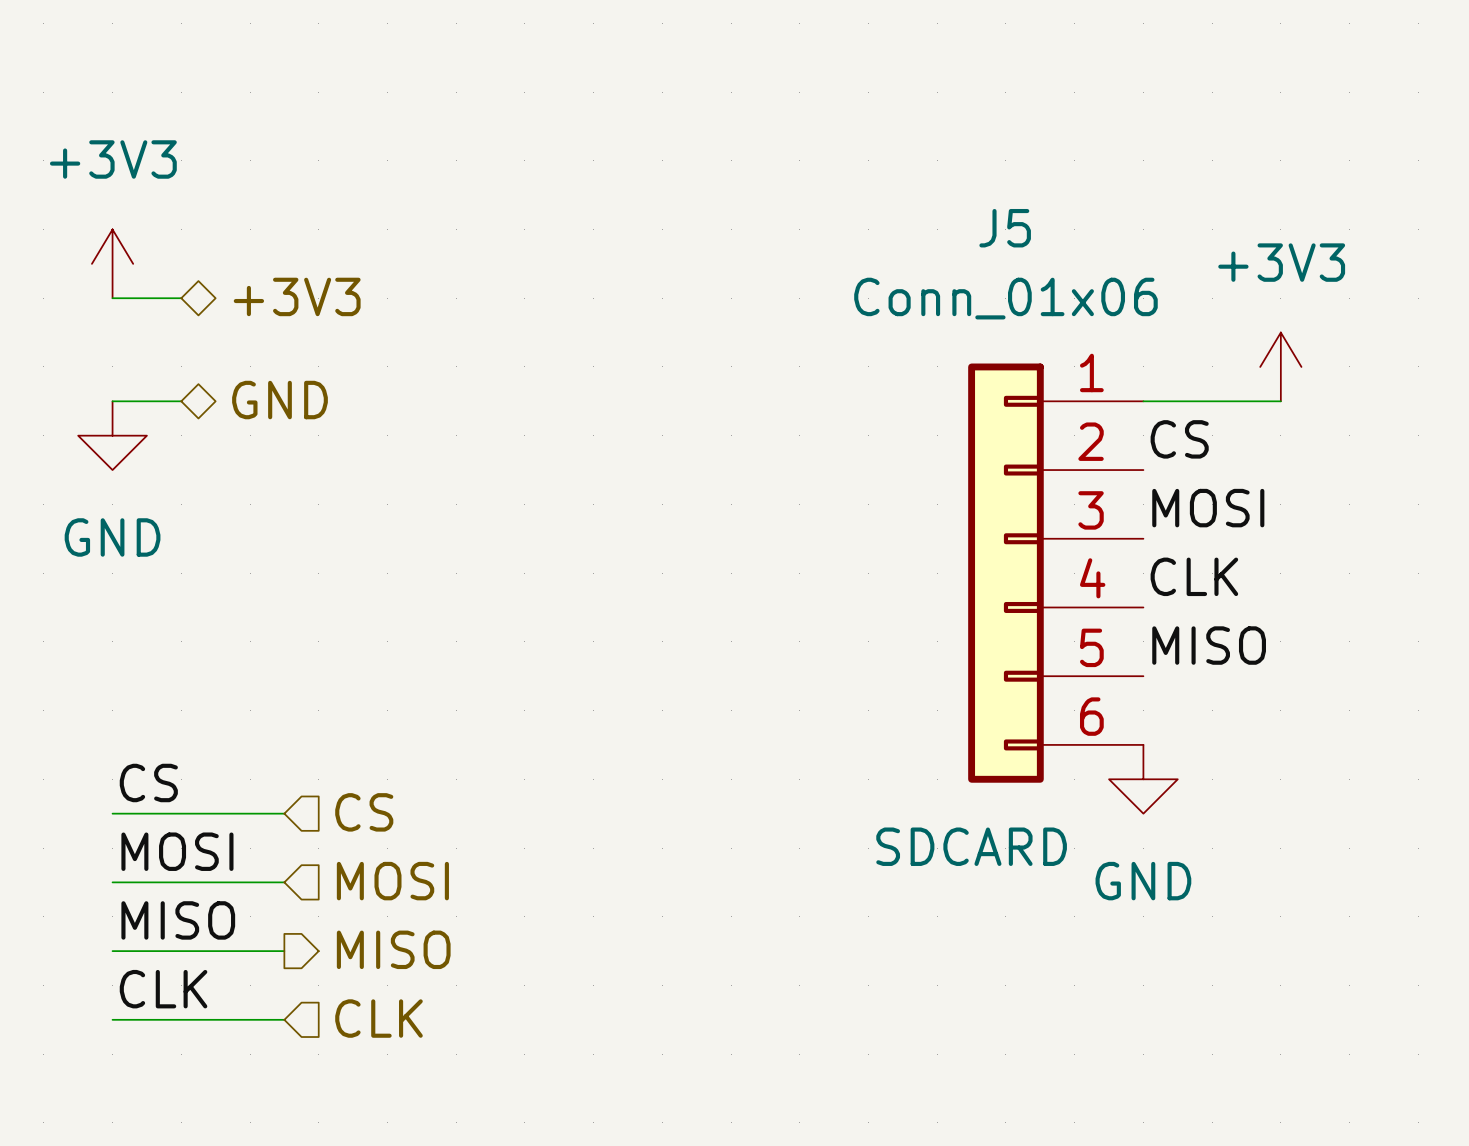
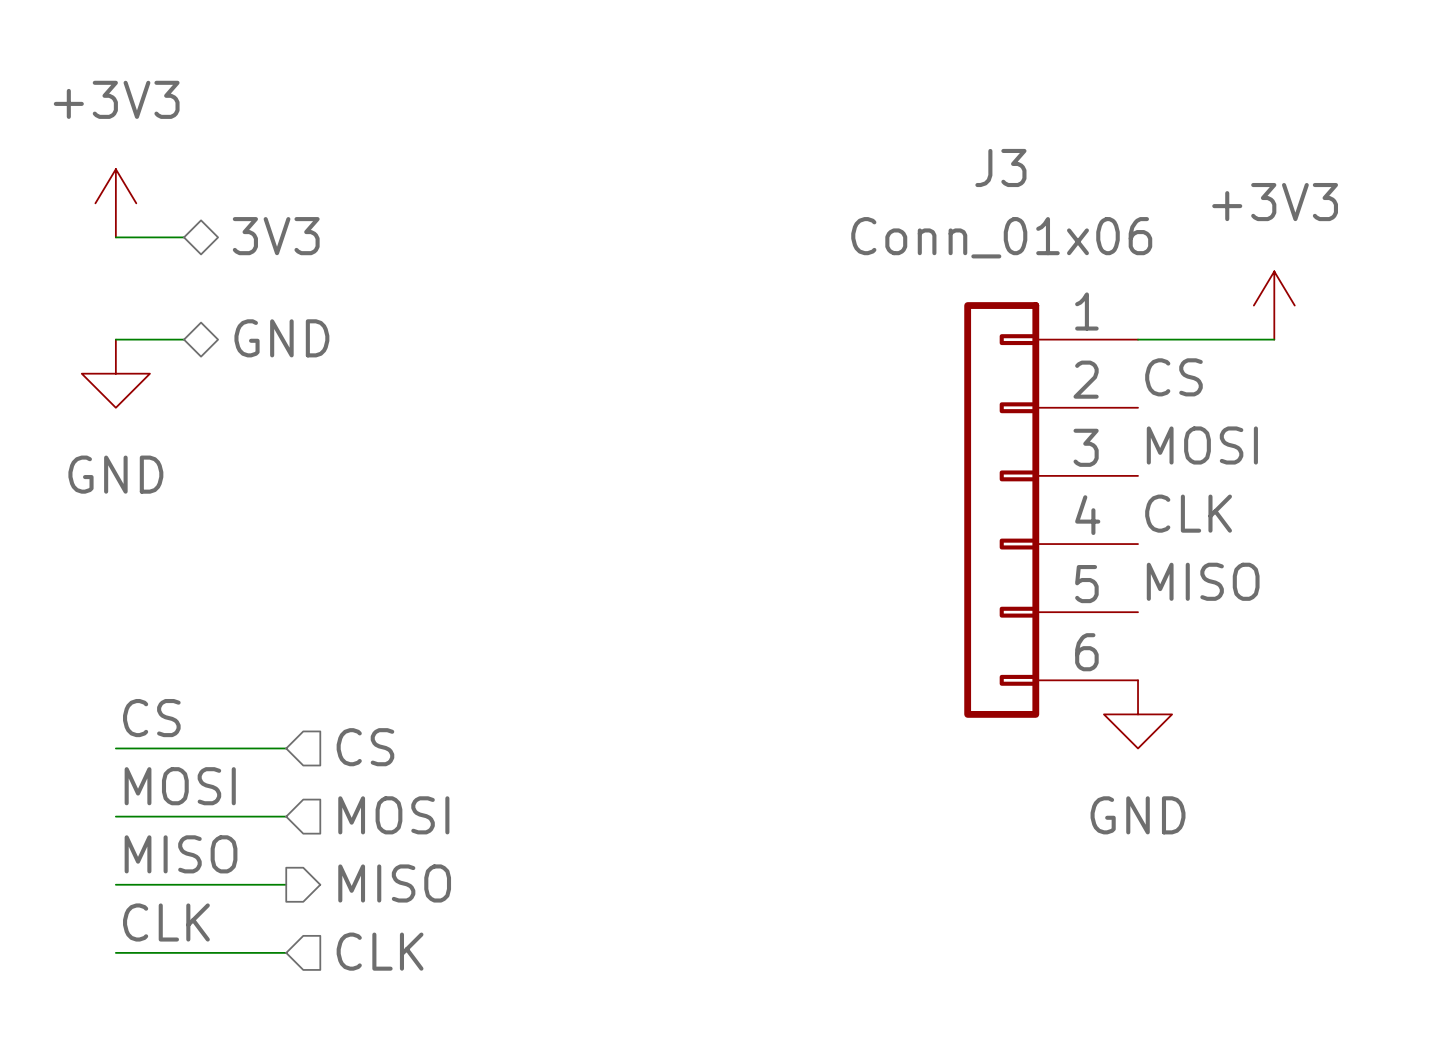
J5 name: J5 (1005, 228) -> J3 (1000, 167)
hierarchical label: +3V3 (297, 296) -> 3V3 (276, 236)
J5 text: SDCARD (971, 846) -> none

